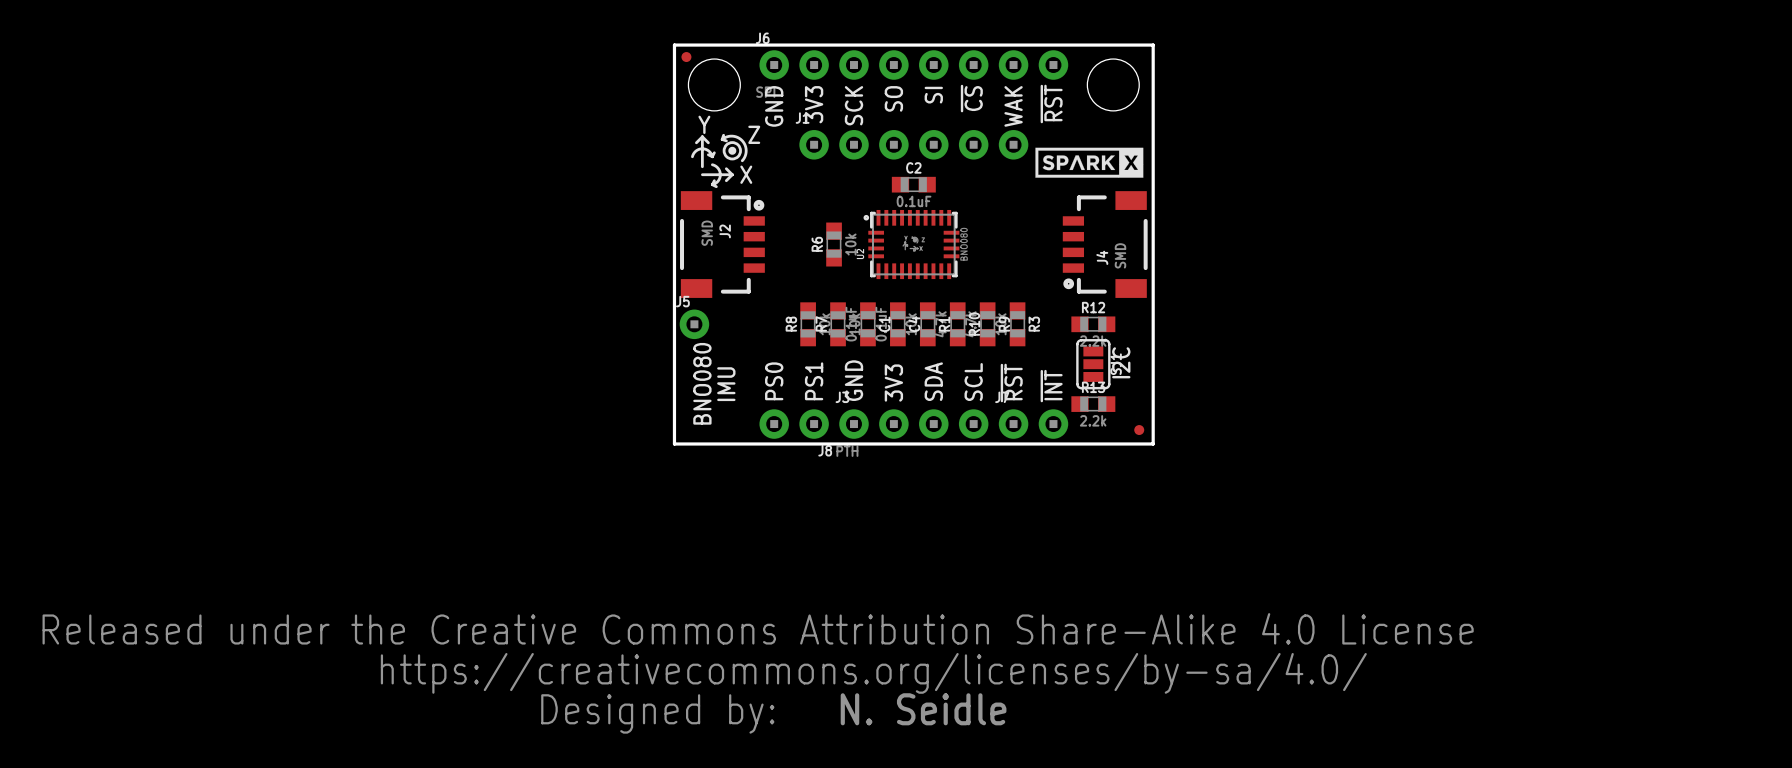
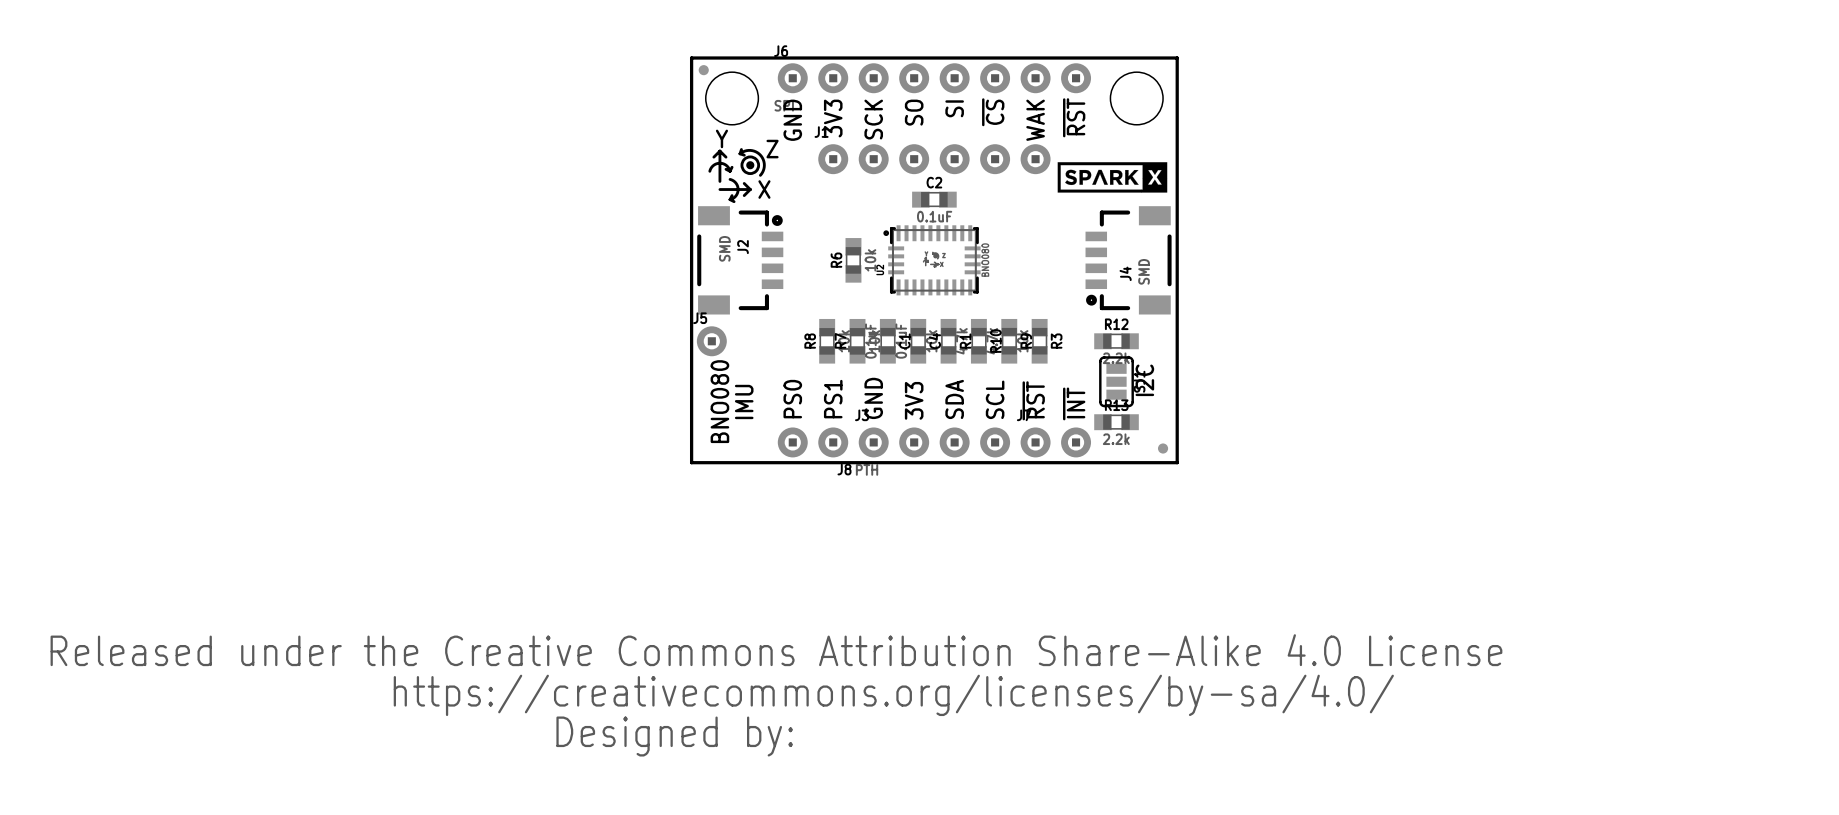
text: N. Seidle (923, 709) -> none

